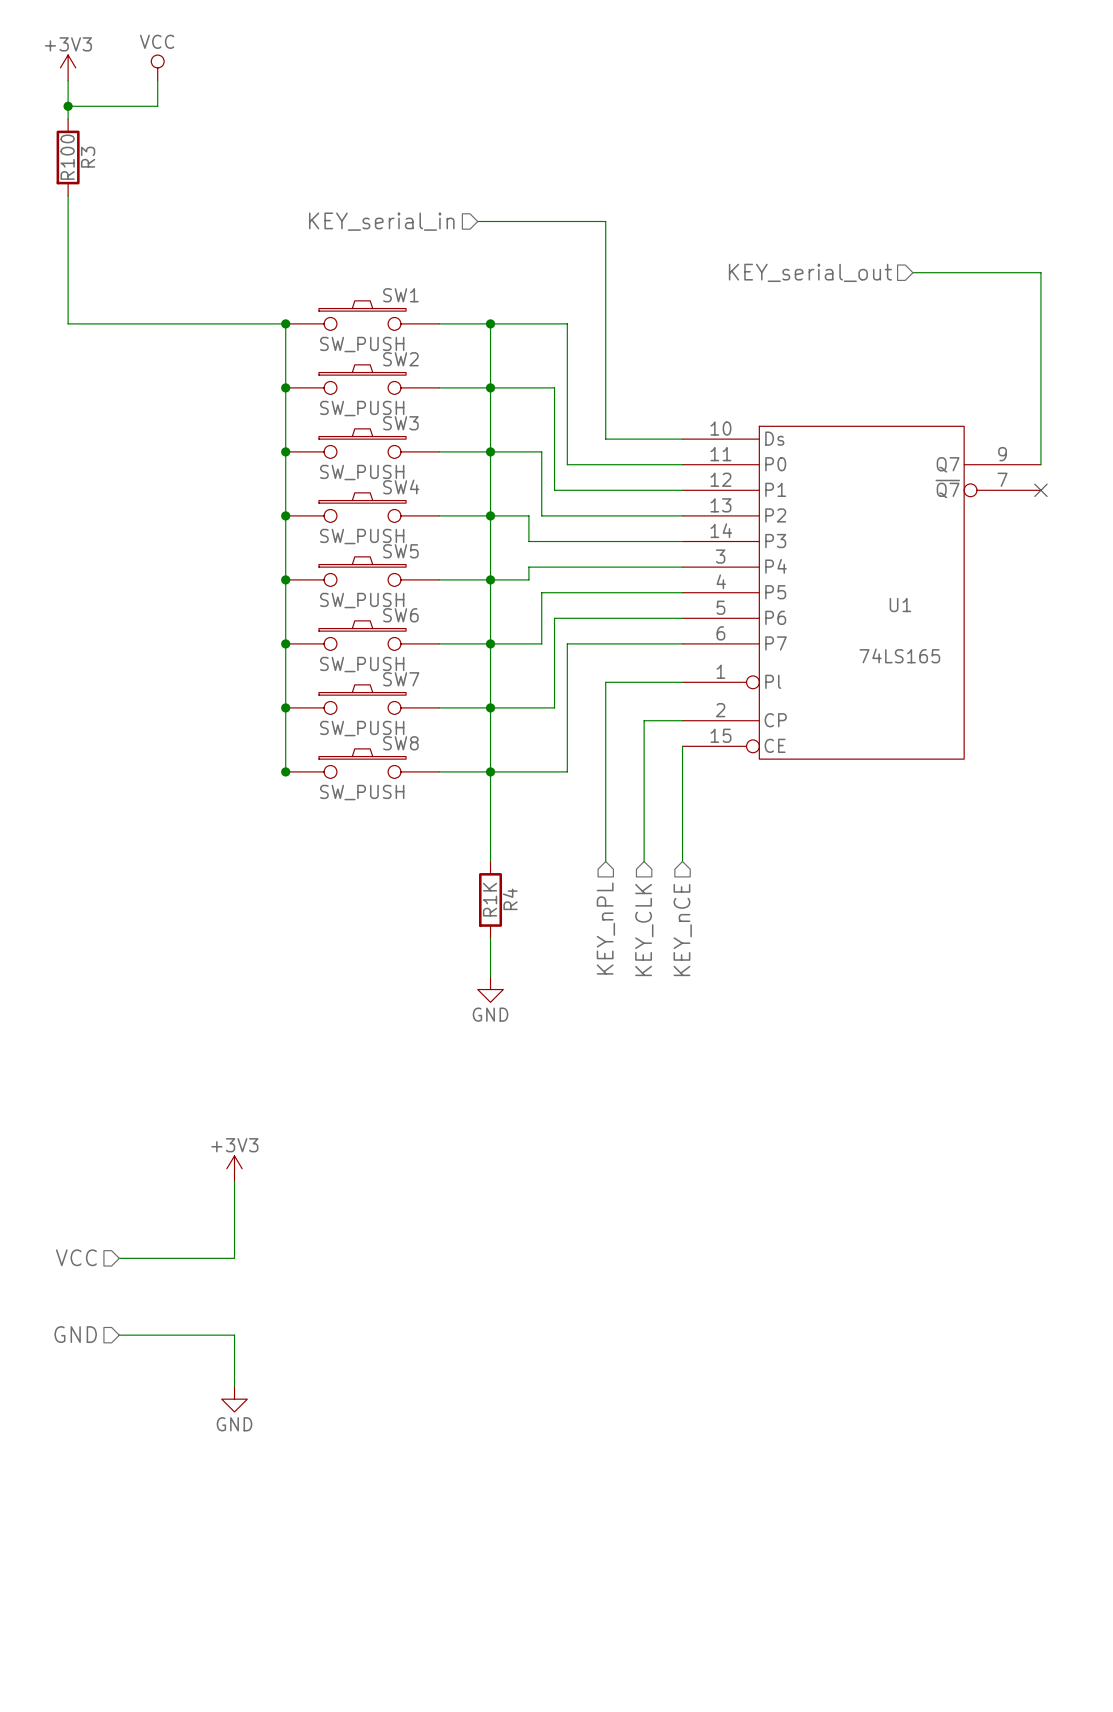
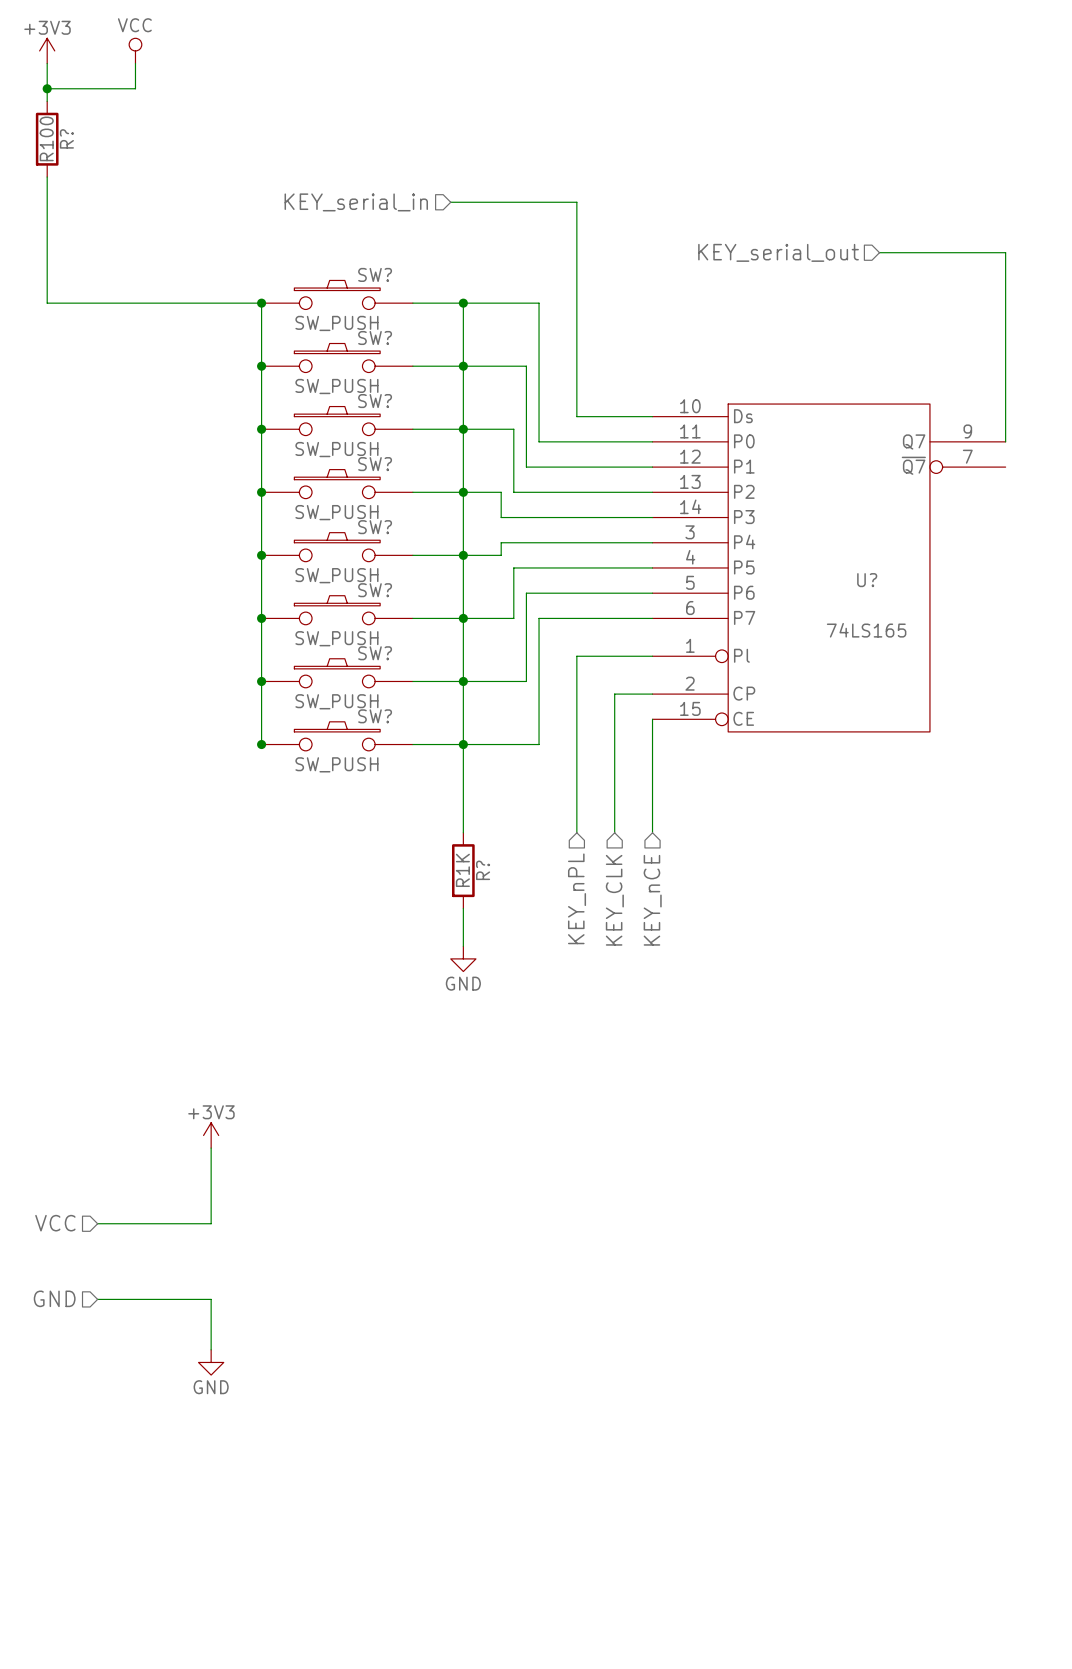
R3 name: R3 (88, 157) -> R? (66, 138)
SW1 name: SW1 (400, 295) -> SW? (375, 274)
SW2 name: SW2 (400, 359) -> SW? (375, 337)
SW3 name: SW3 (400, 423) -> SW? (375, 401)
SW4 name: SW4 (401, 486) -> SW? (375, 464)
no-connect mark: (1040, 490) -> none
SW5 name: SW5 (400, 551) -> SW? (375, 527)
U1 name: U1 (900, 605) -> U? (867, 580)
SW6 name: SW6 (400, 615) -> SW? (375, 590)
SW7 name: SW7 (401, 679) -> SW? (375, 653)
SW8 name: SW8 (400, 743) -> SW? (375, 716)
R4 name: R4 (510, 899) -> R? (483, 870)

